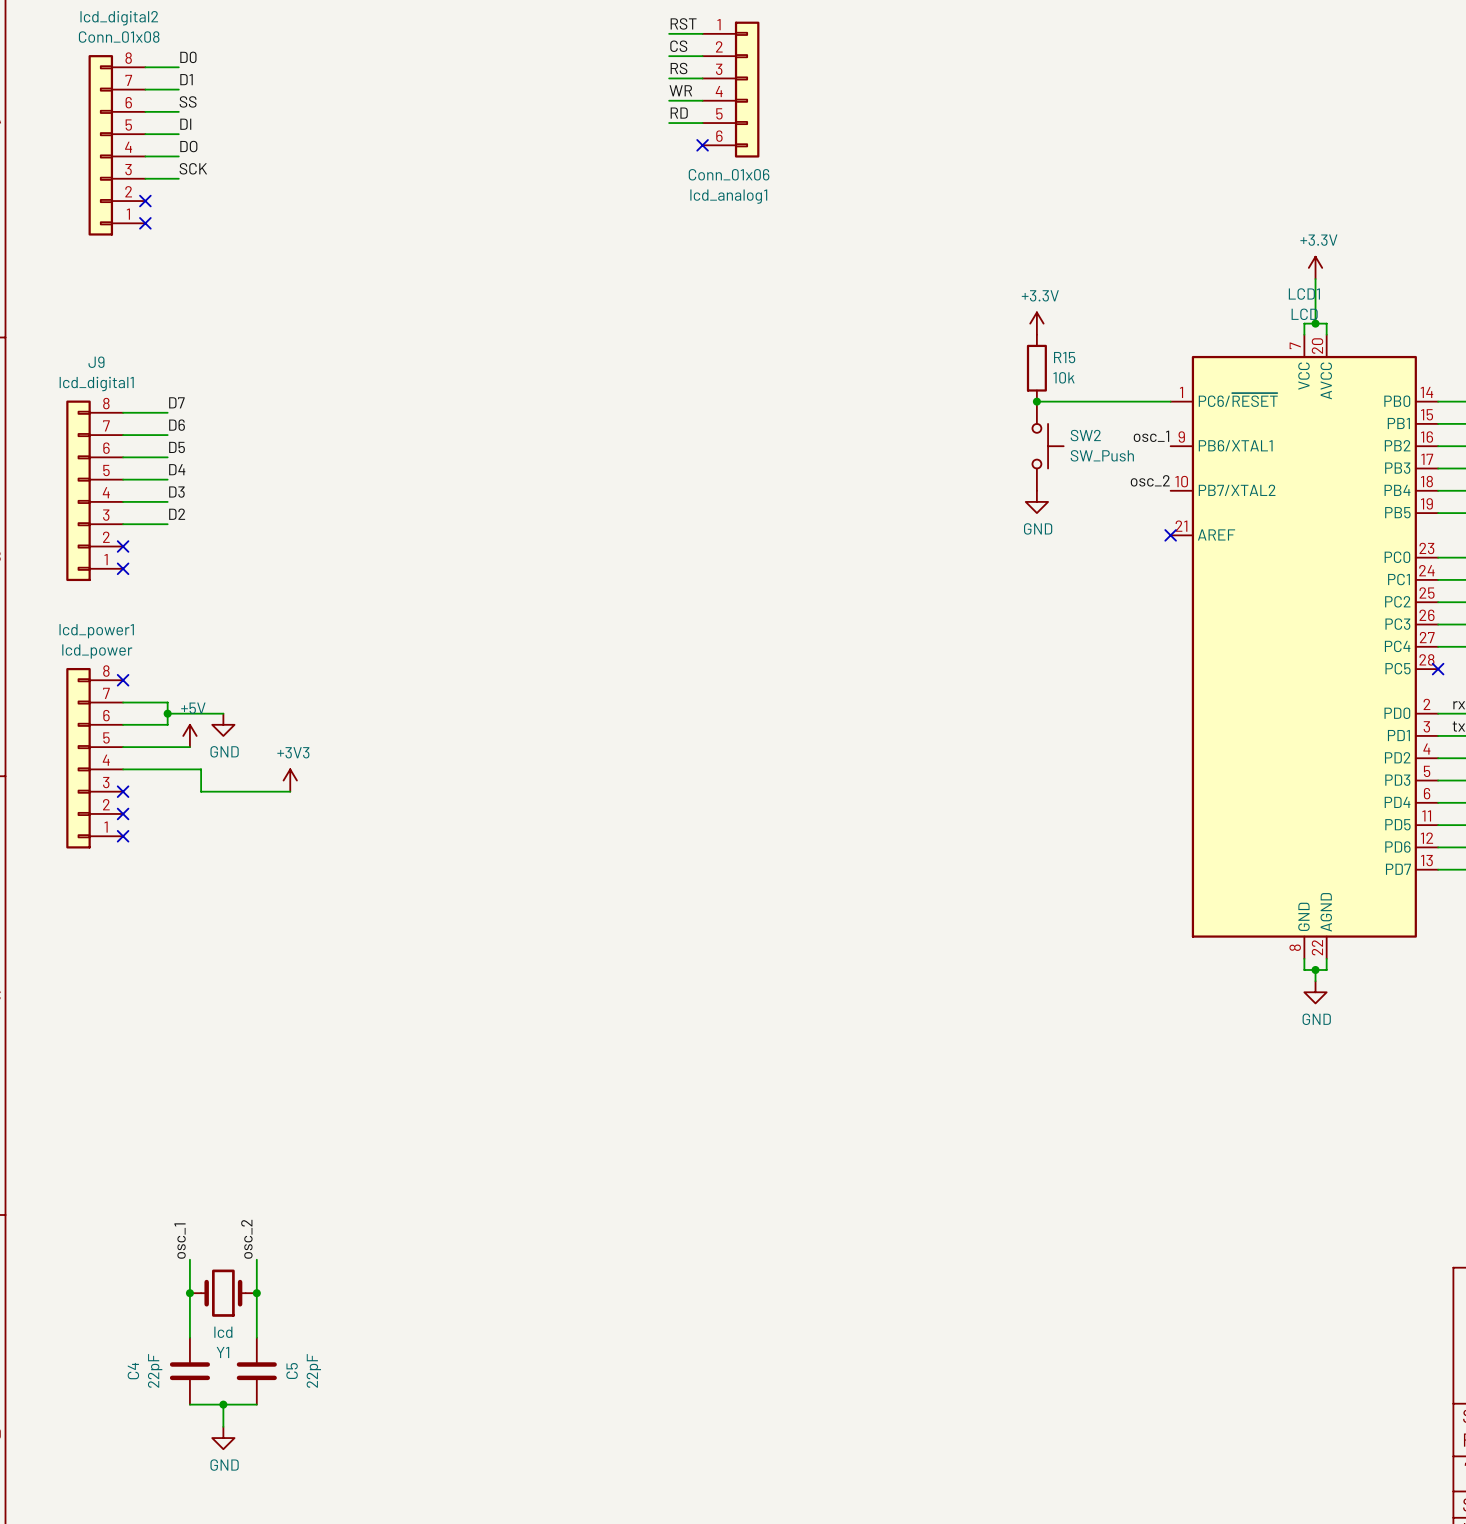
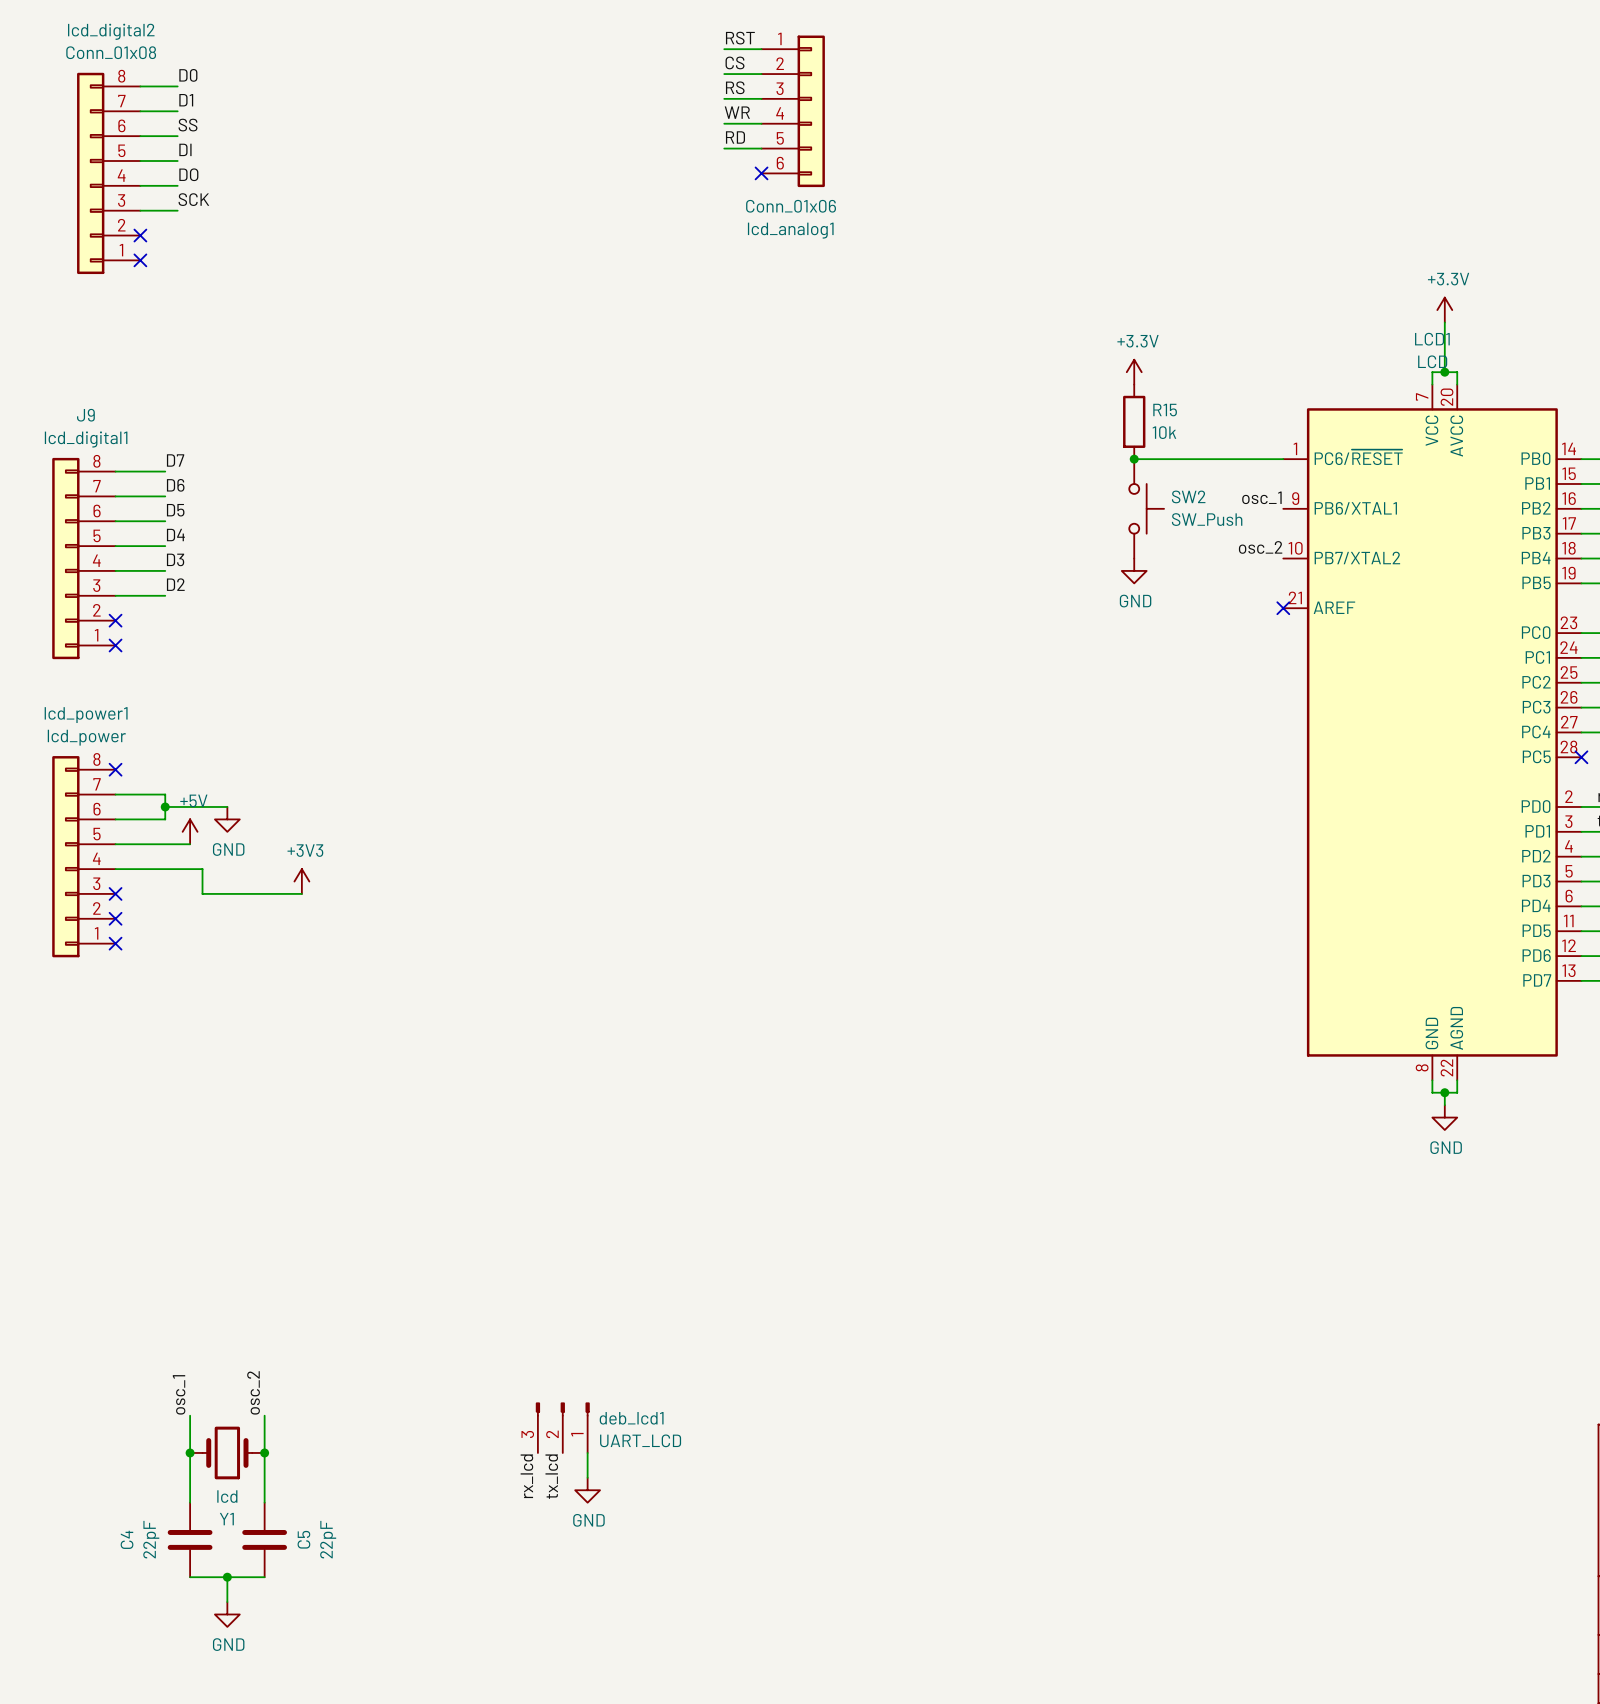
deb_lcd1: none -> UART_LCD (562, 1427)
wire: none -> (587, 1452) (587, 1477)
label: none -> rx_lcd (526, 1476)
label: none -> tx_lcd (551, 1476)
power symbol: none -> GND (587, 1490)

